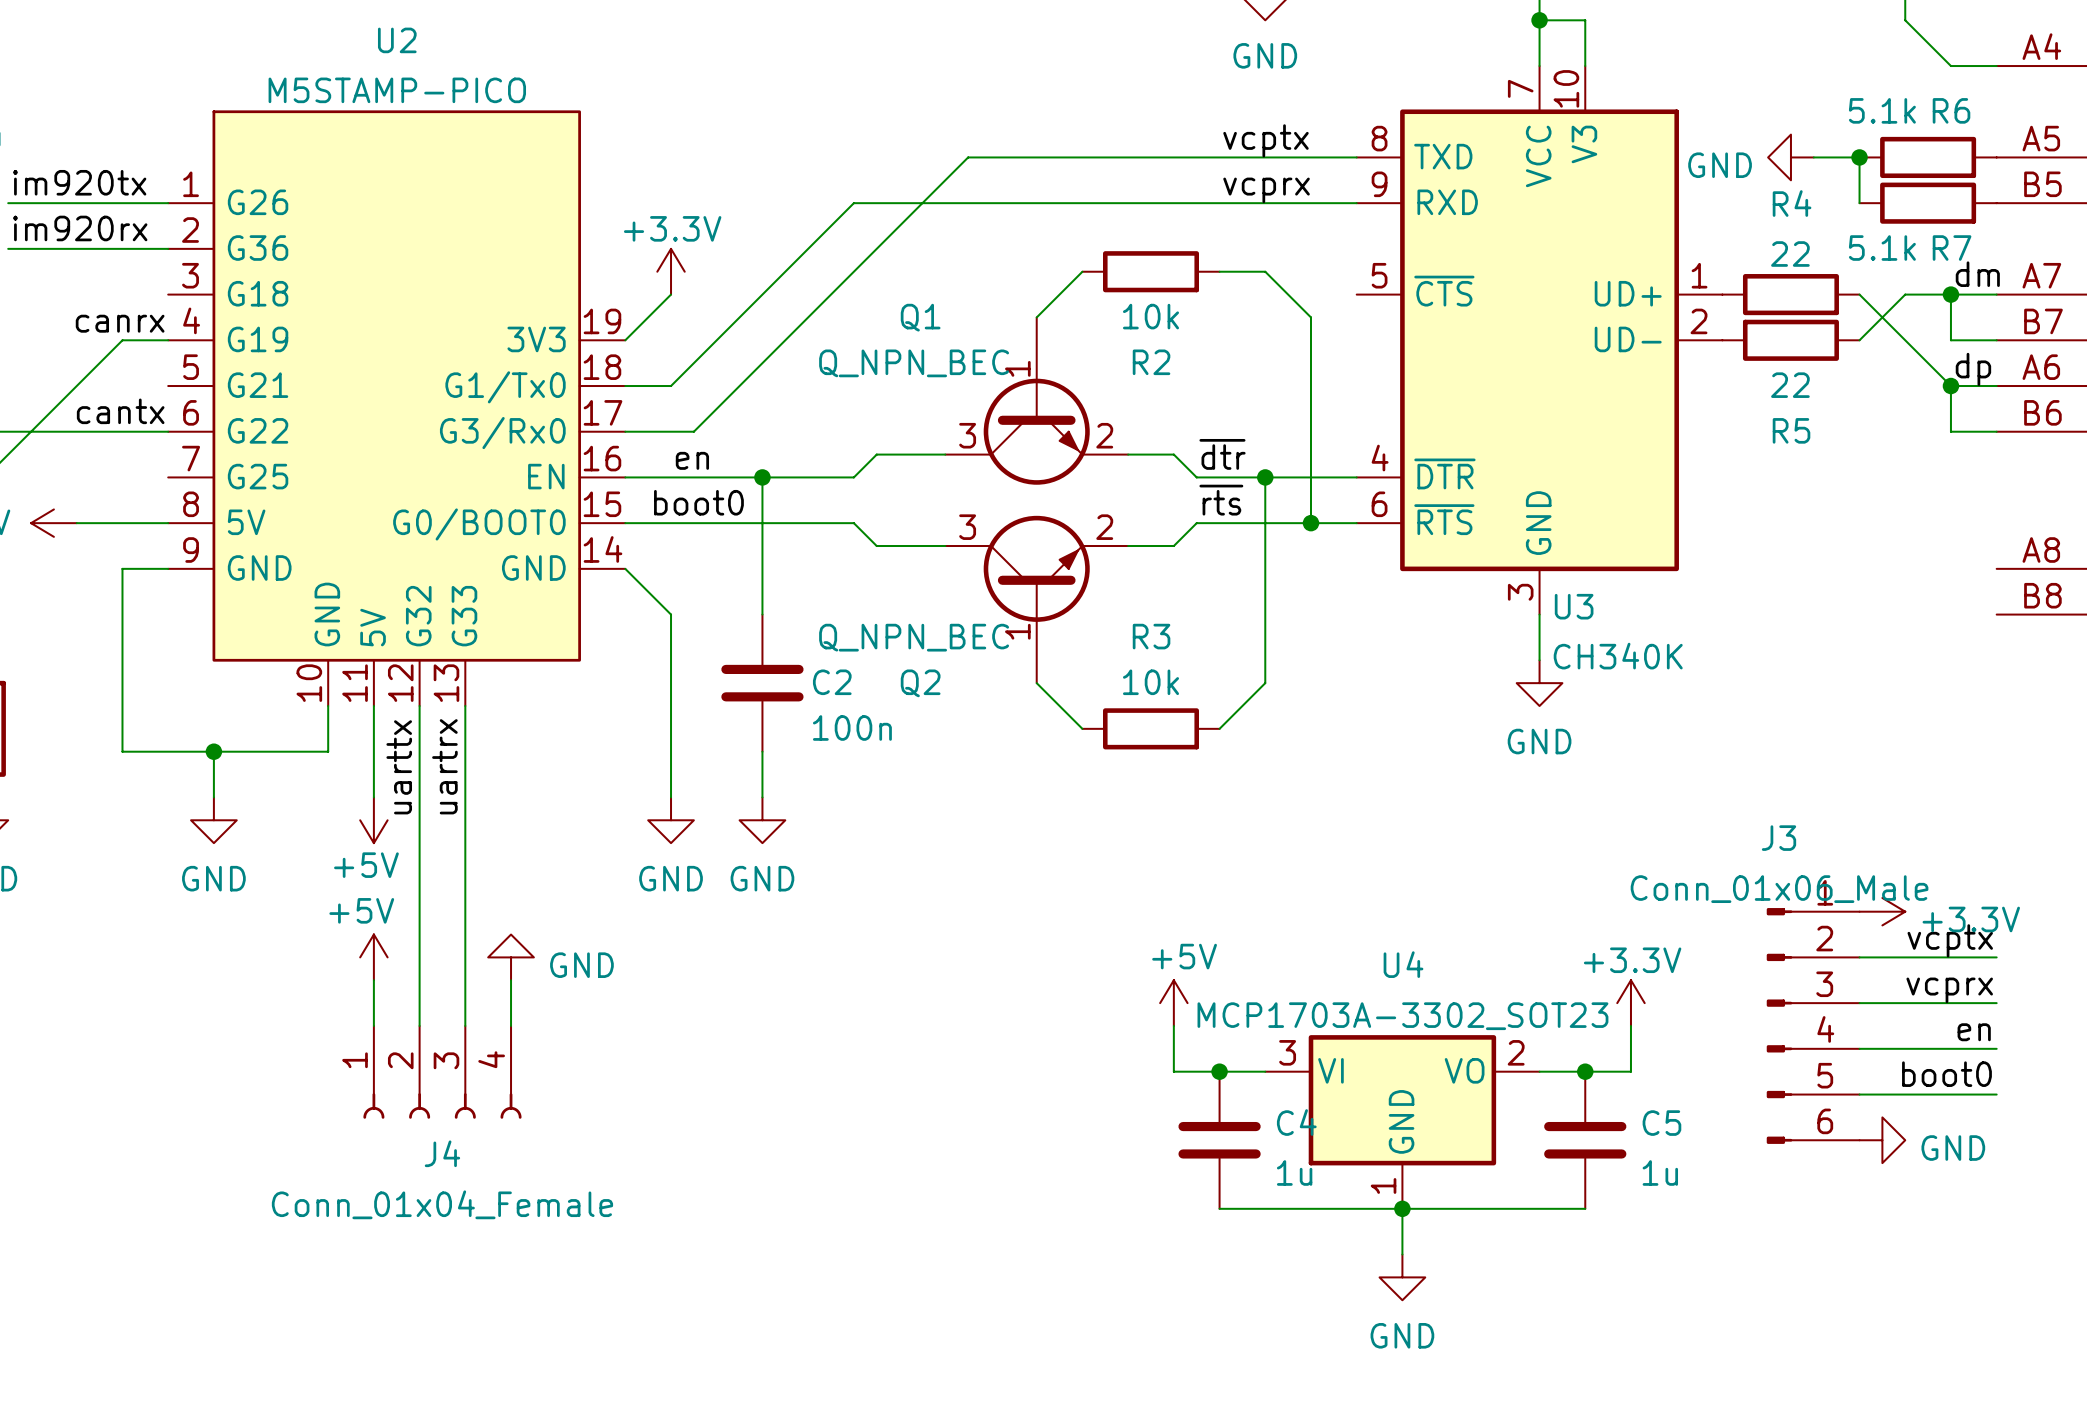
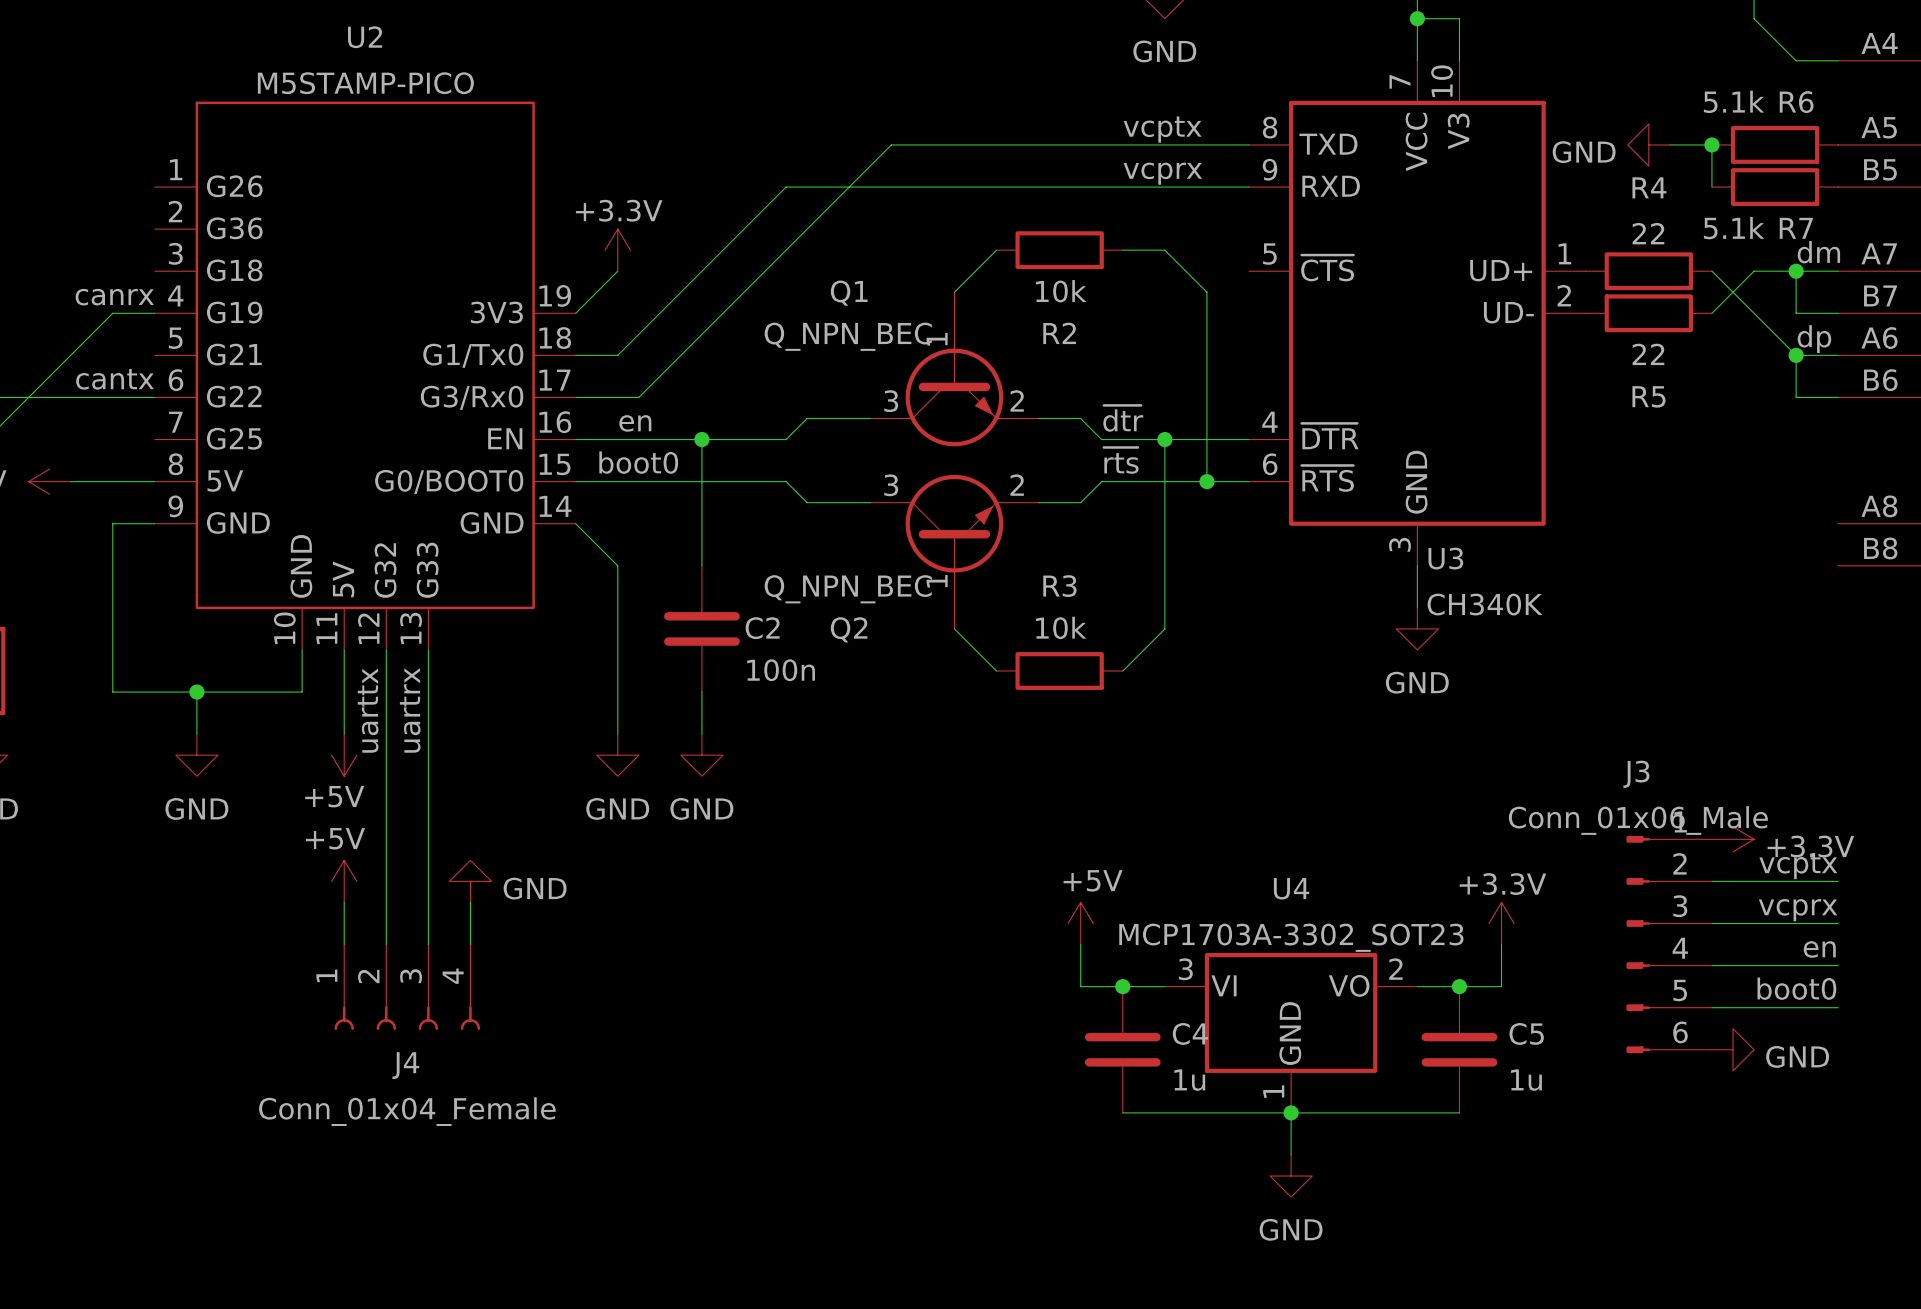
label: im920tx (79, 182) -> none
wire: (8, 203) (168, 203) -> none
label: im920rx (80, 228) -> none
wire: (8, 248) (168, 248) -> none

